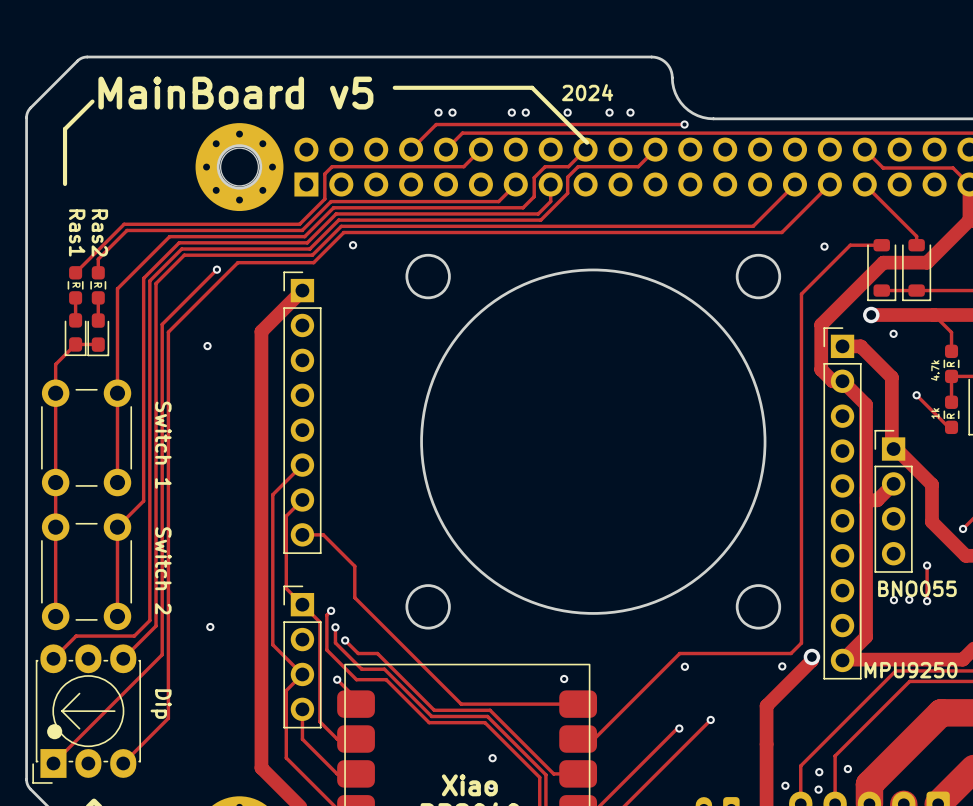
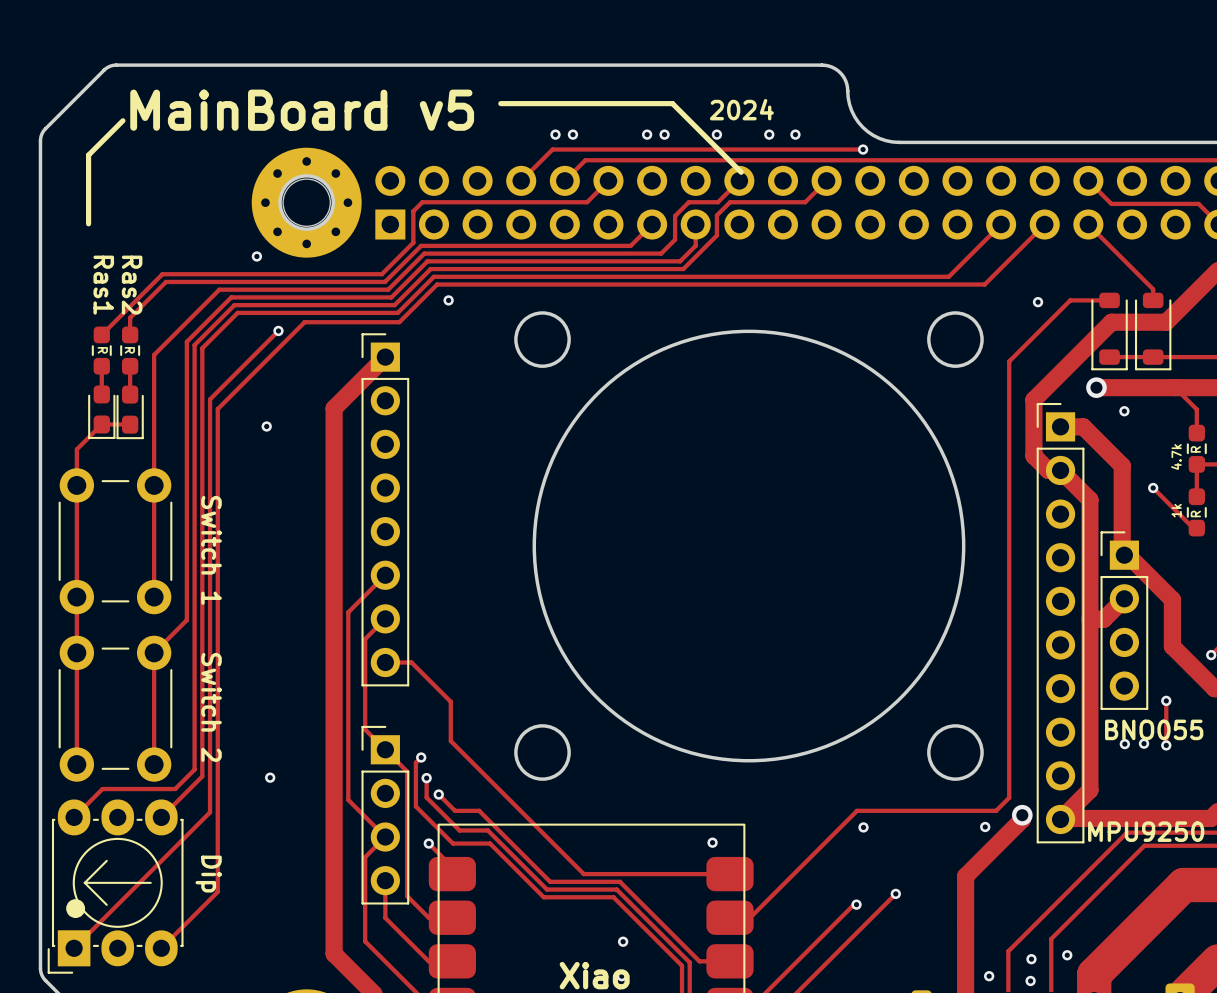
via: none -> (256, 256)

